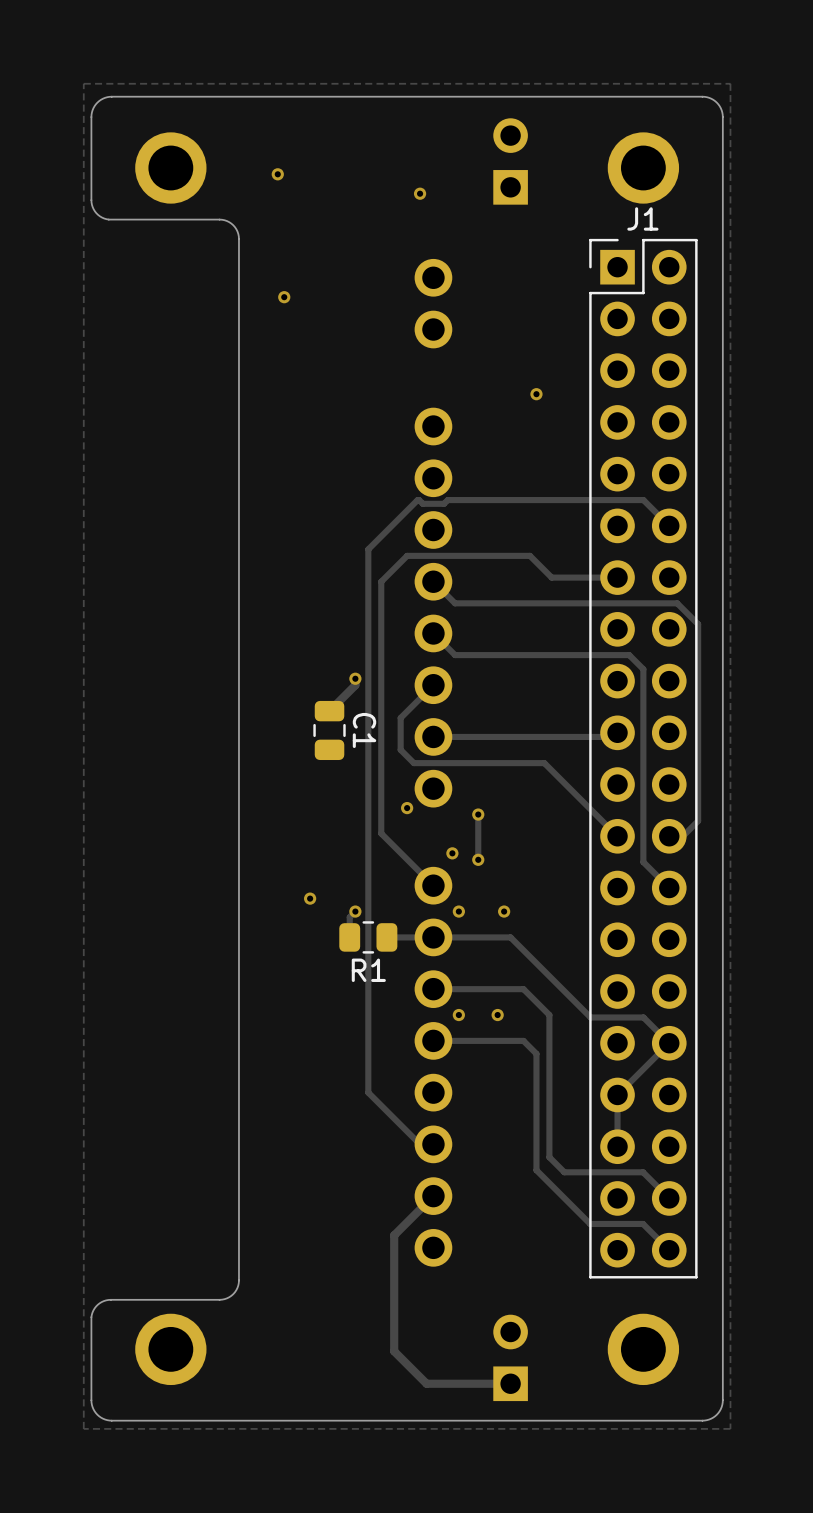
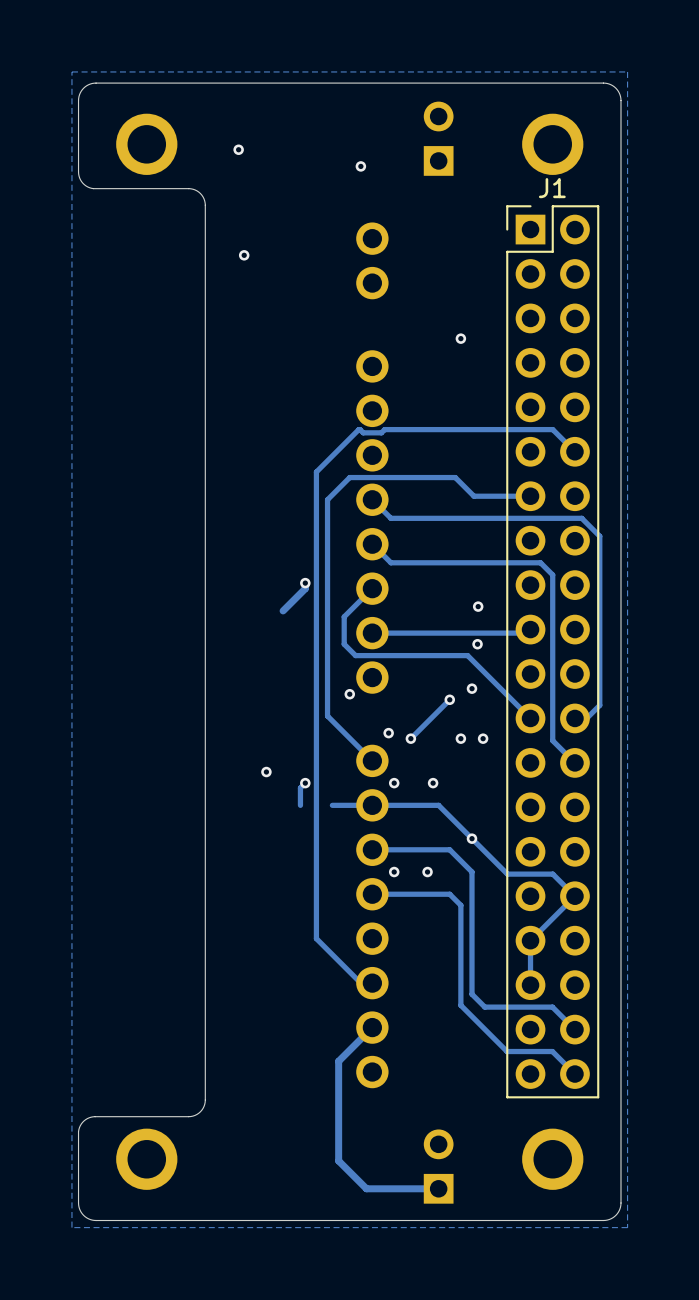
via: none -> (478, 606)
C1: (329, 730) -> none
via: none -> (477, 644)
via: none -> (471, 688)
track: (478, 814) (478, 859) -> (449, 699) (410, 738)
via: (478, 814) -> none
via: none -> (449, 699)
via: none -> (460, 738)
via: none -> (483, 738)
R1: (368, 937) -> none
via: none -> (471, 838)

